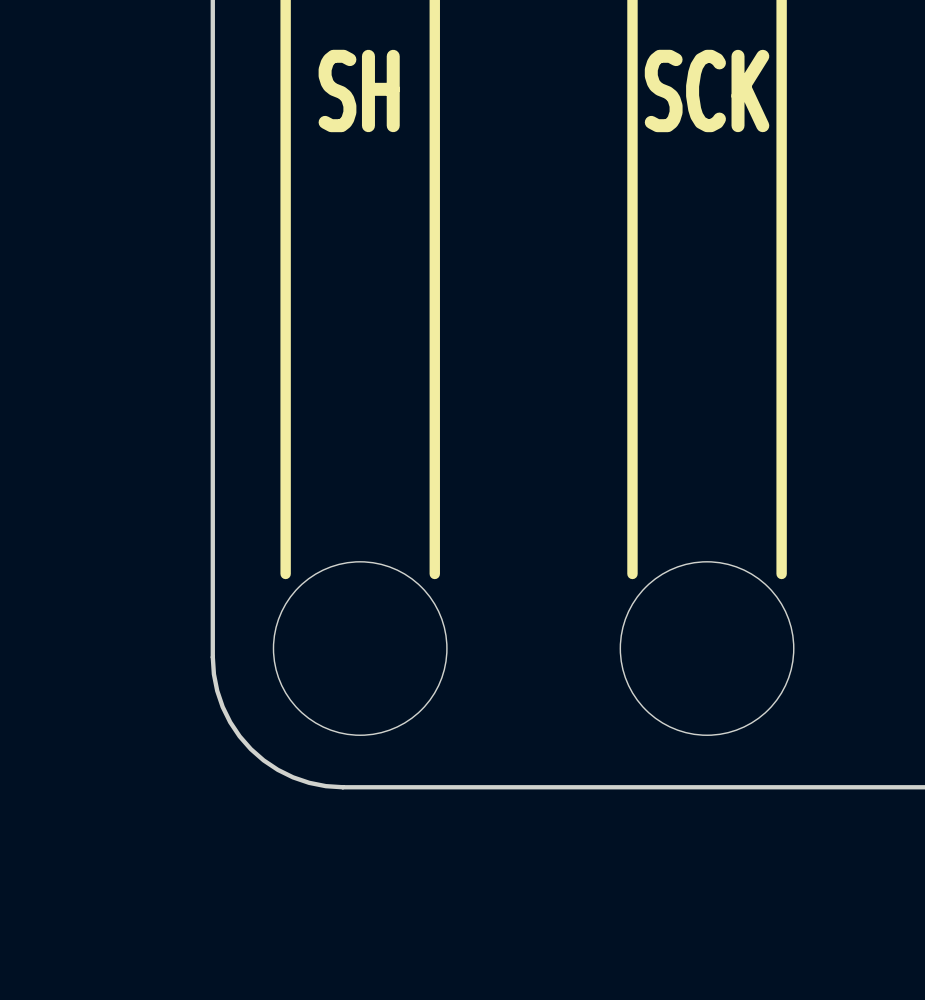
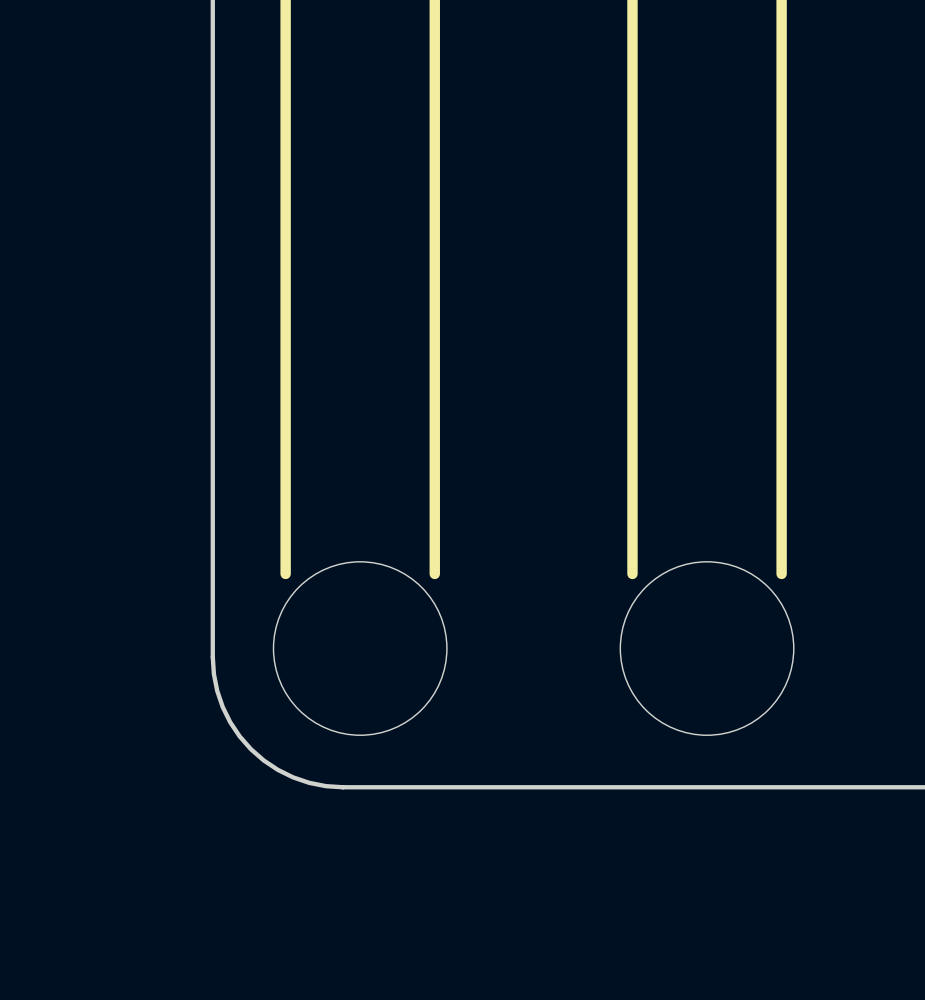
text: SH (359, 90) -> none
text: SCK (707, 90) -> none

